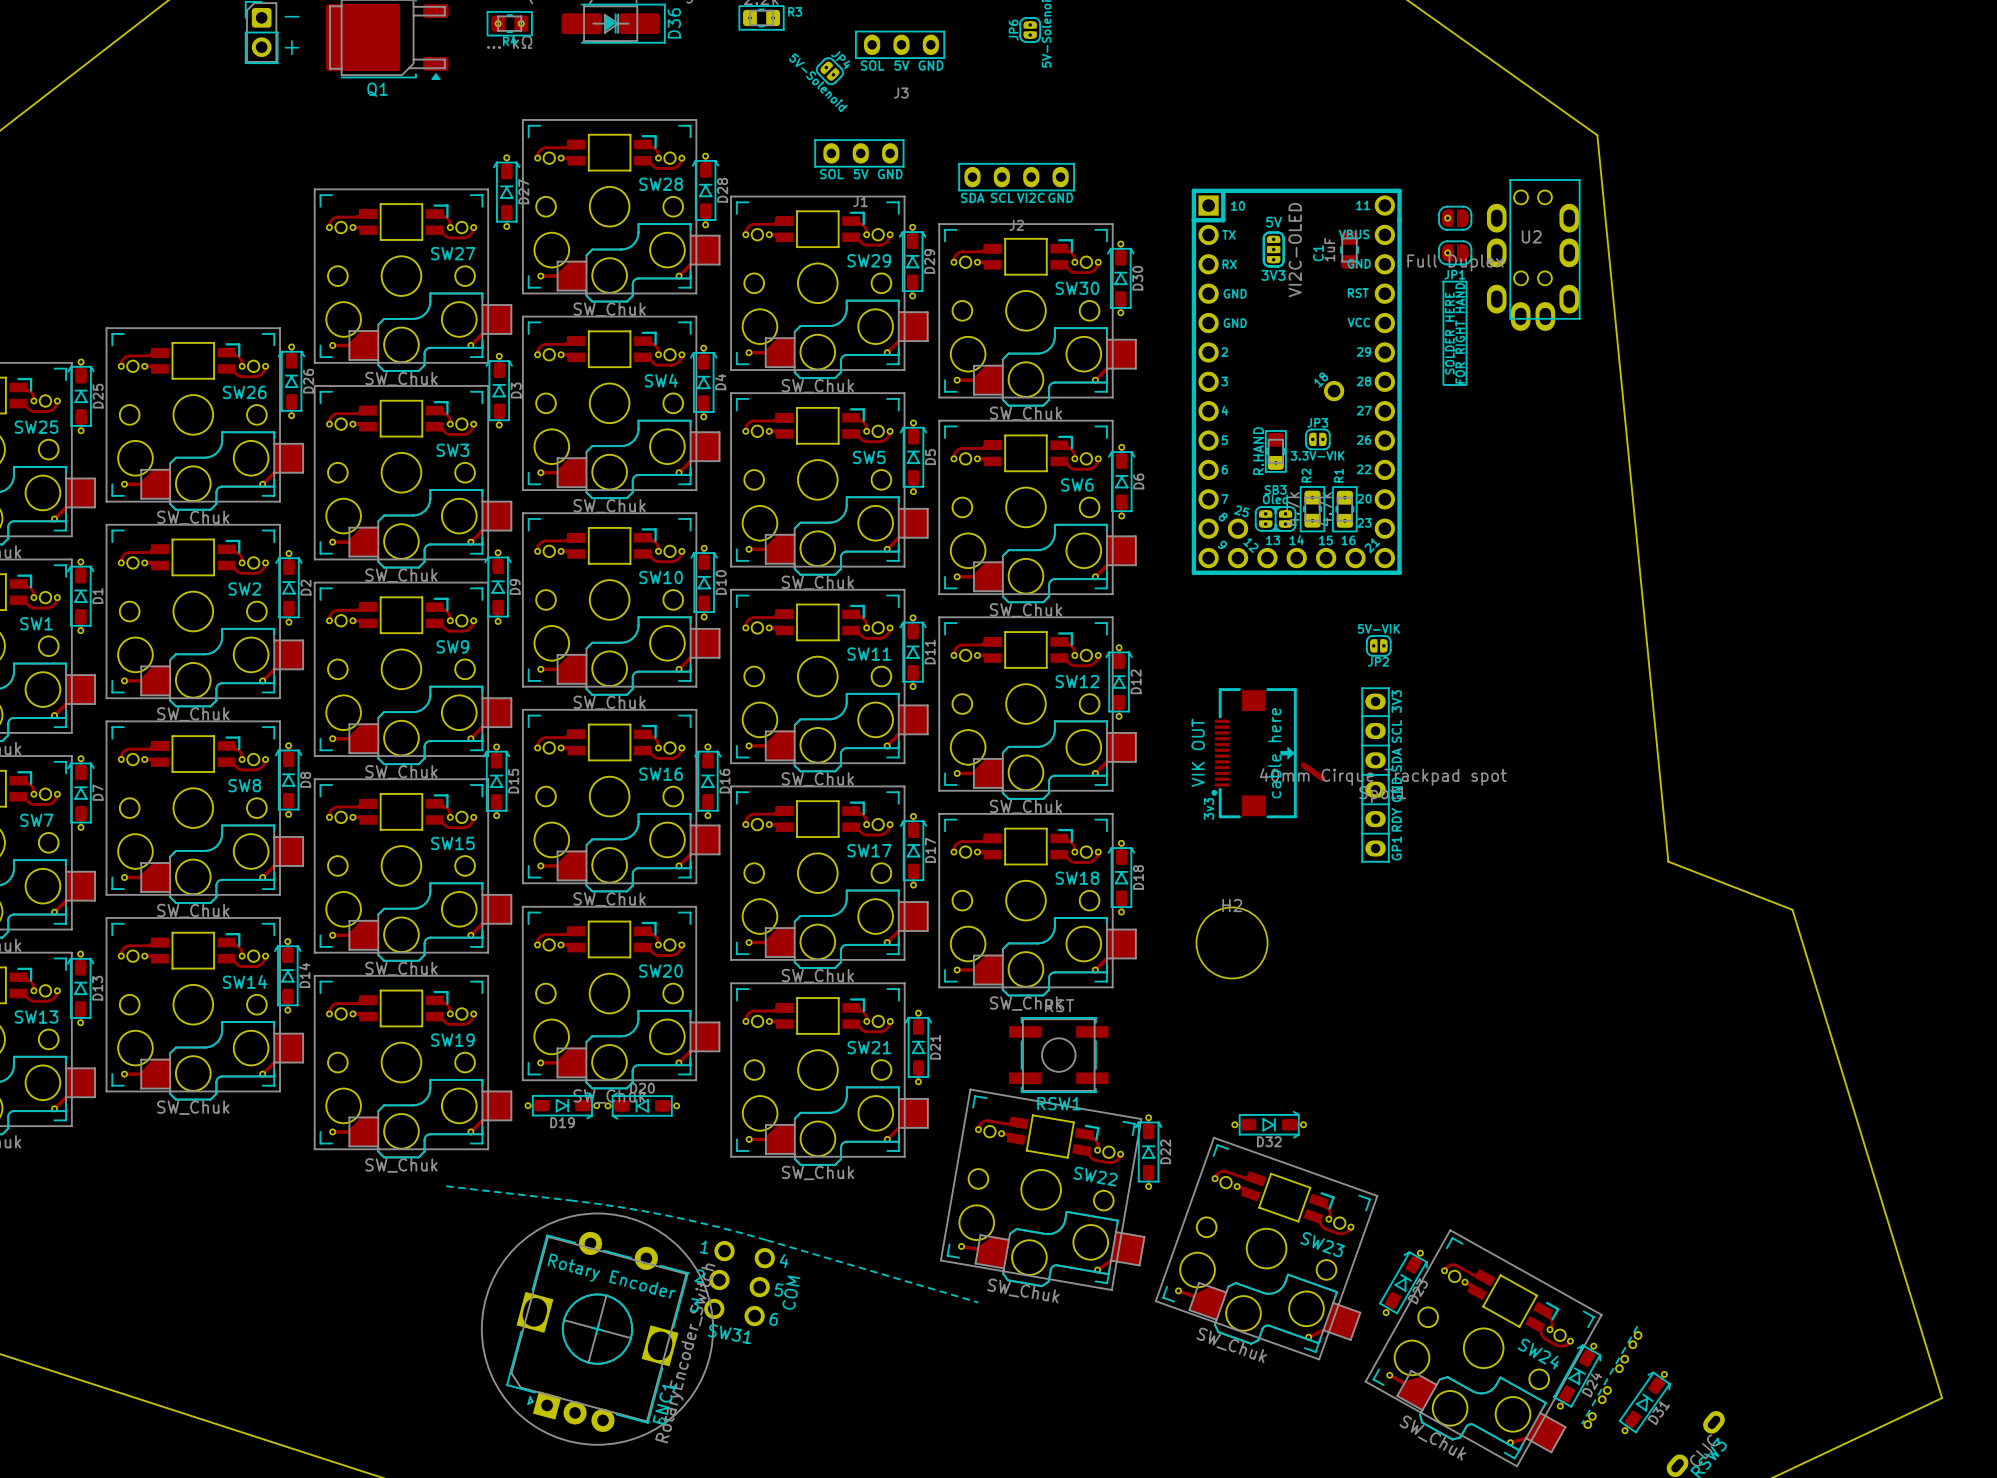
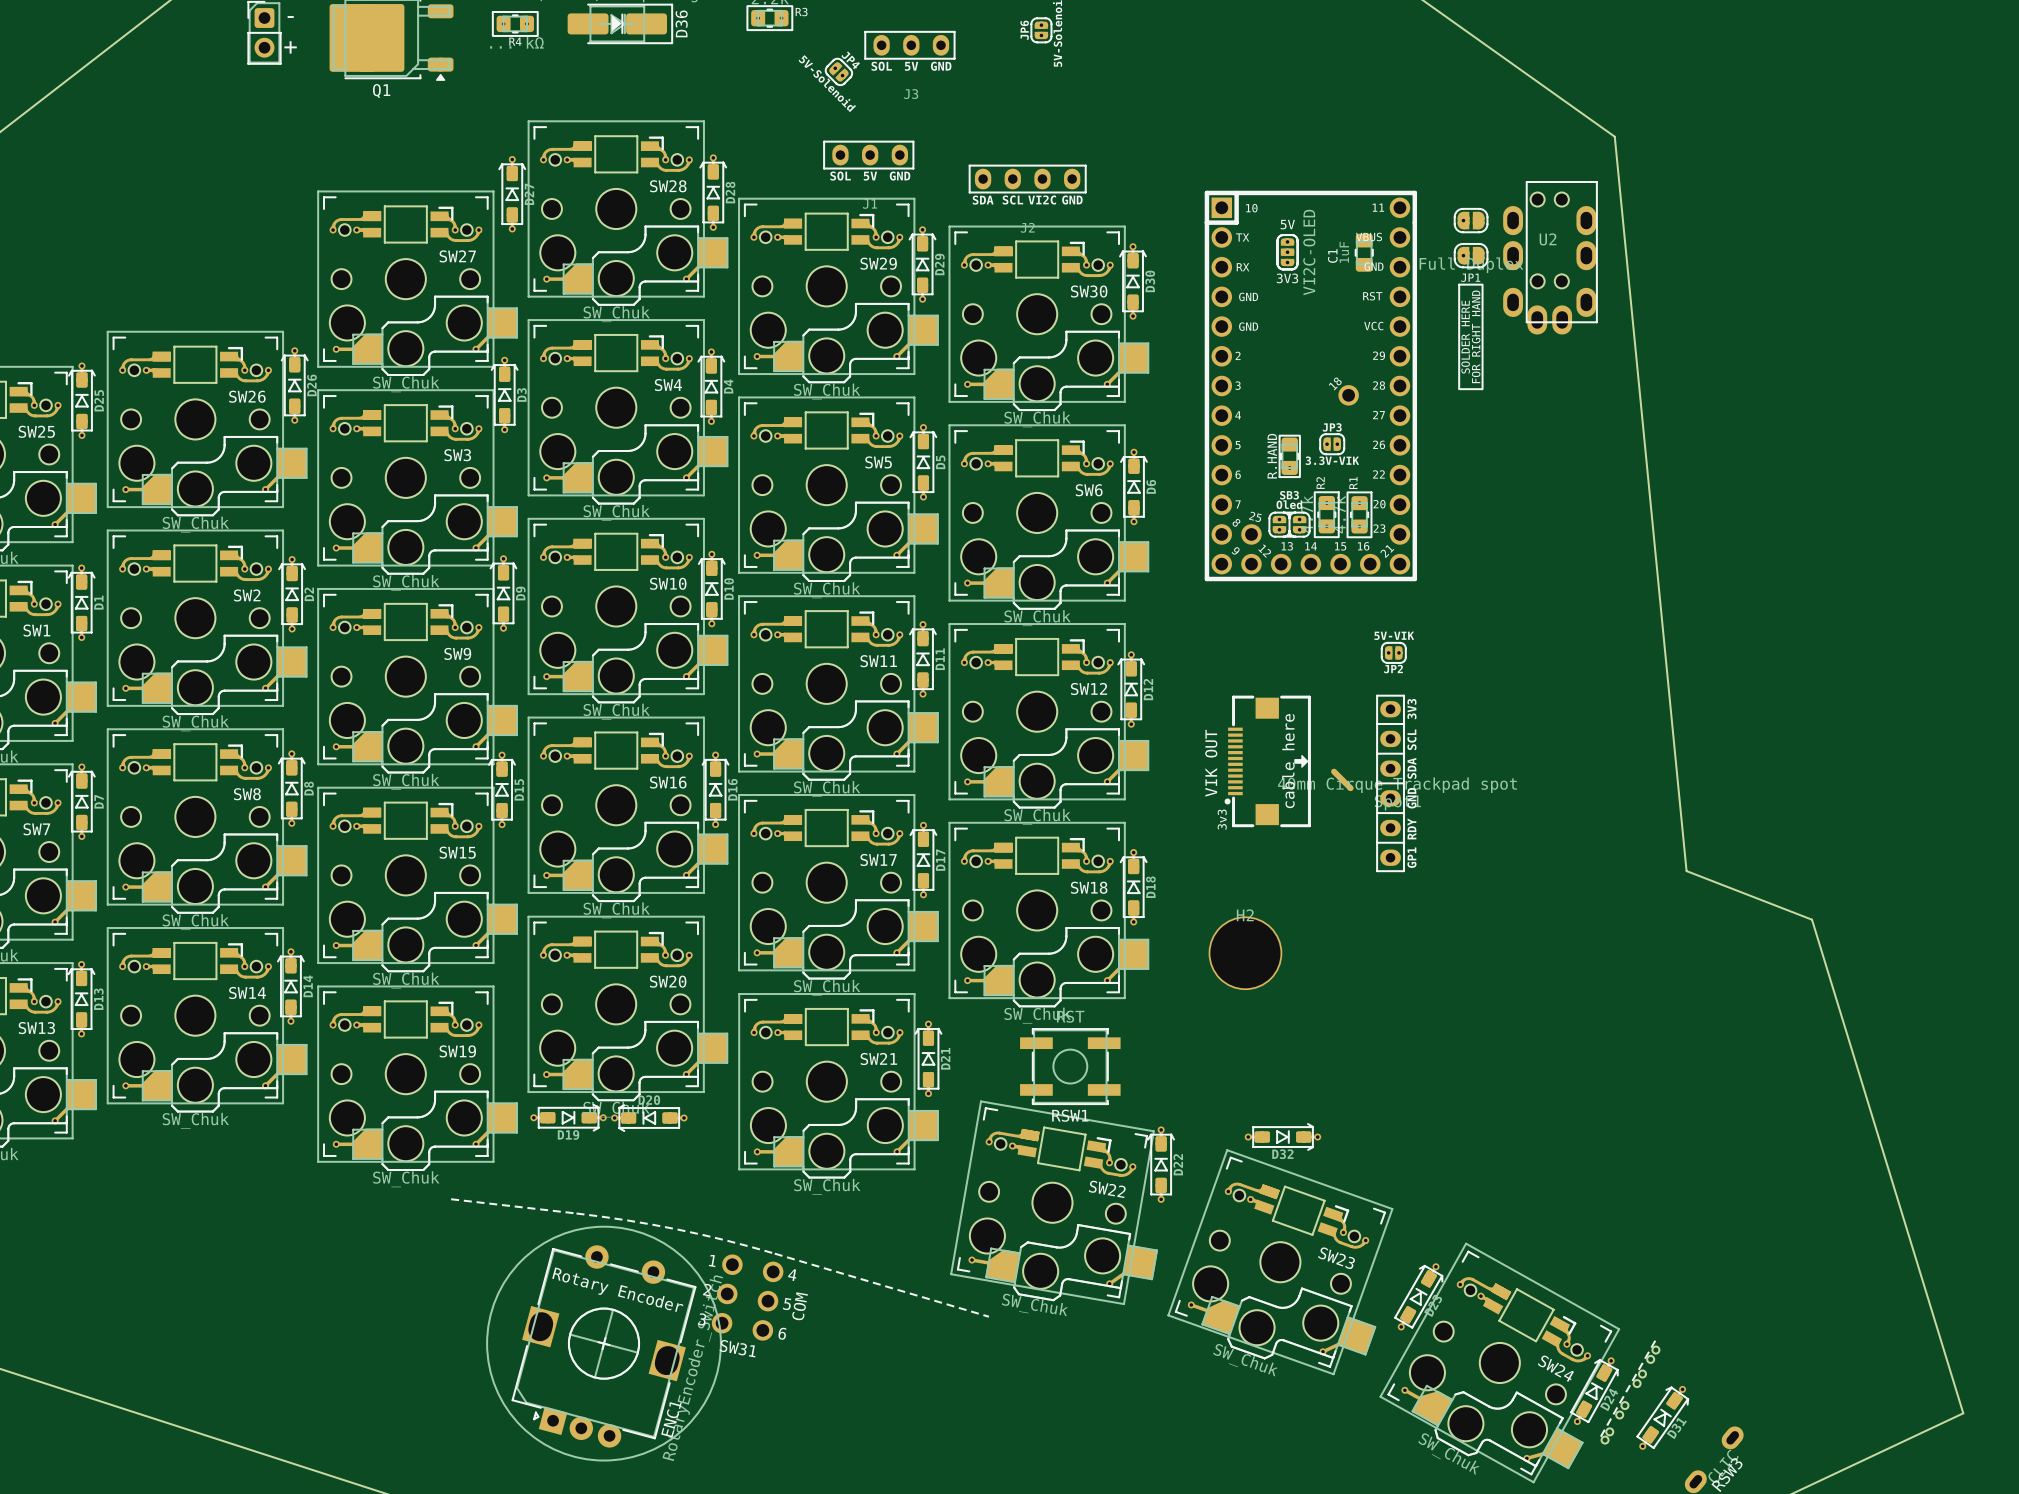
part: (1313, 771) -> none
part: none -> (1342, 779)

